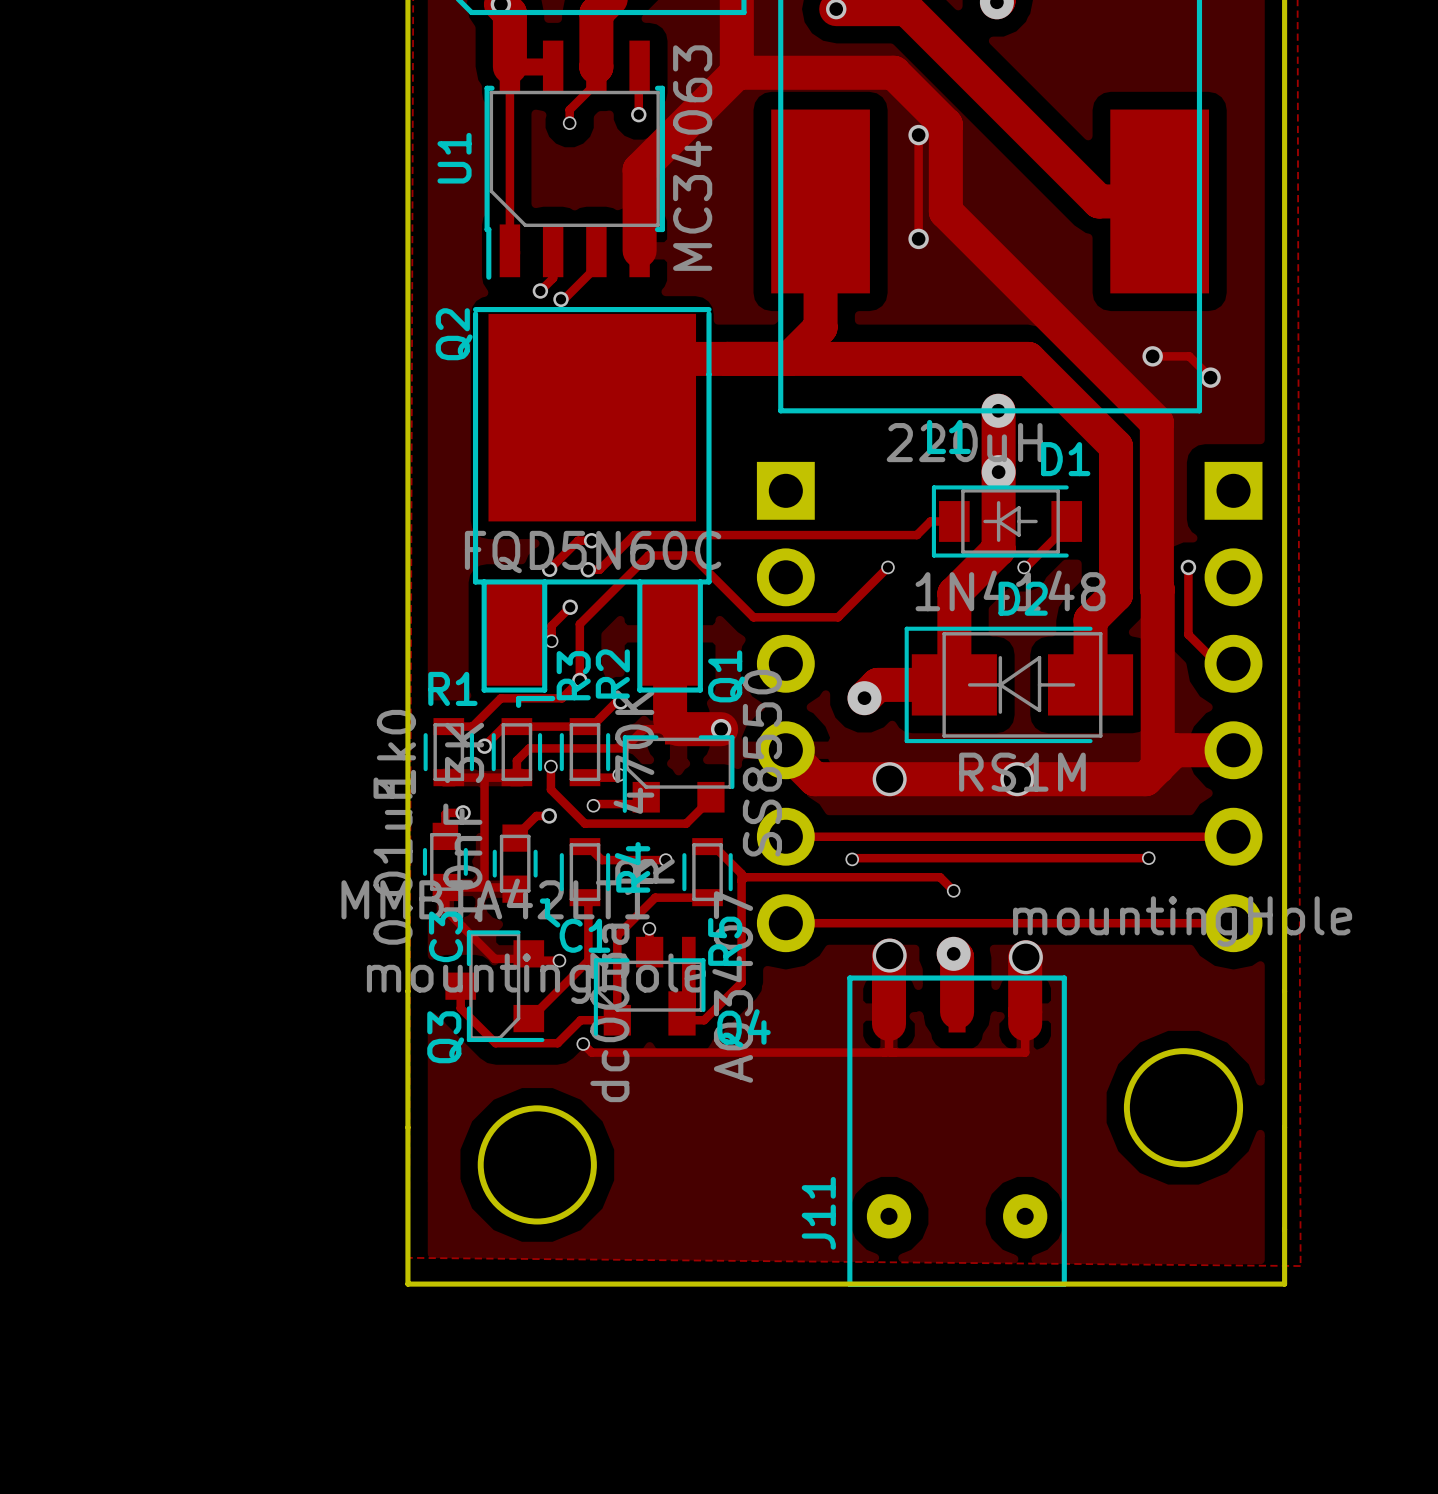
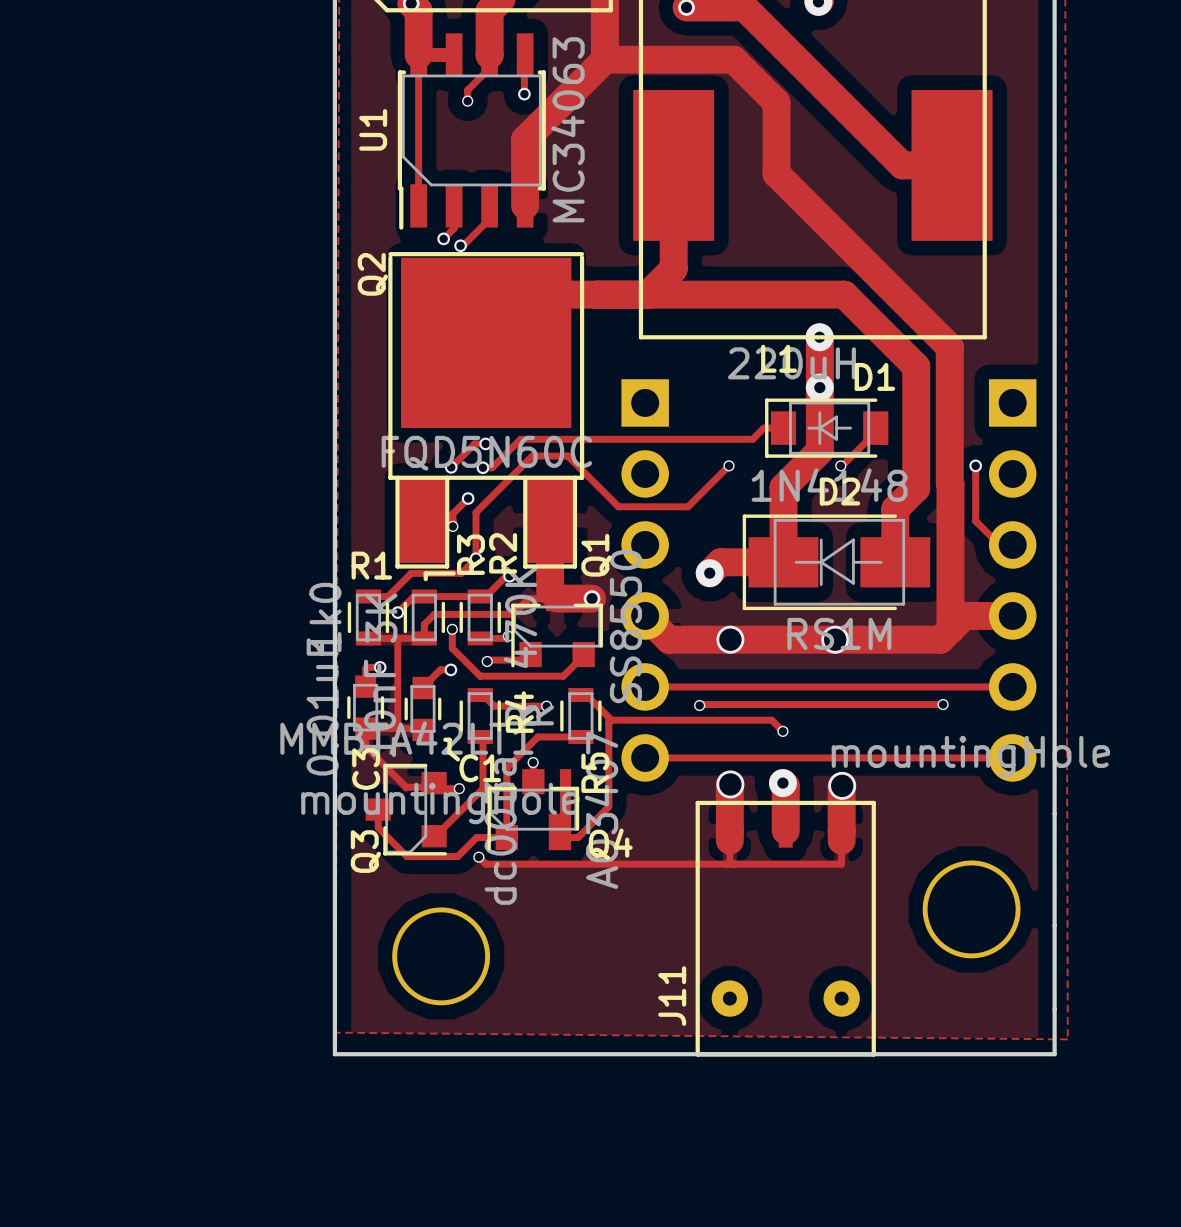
track: (918, 135) (918, 238) -> none
via: (918, 135) -> none
via: (918, 238) -> none
track: (1152, 356) (1189, 356) (1210, 377) -> none
via: (1152, 356) -> none
via: (1210, 377) -> none

